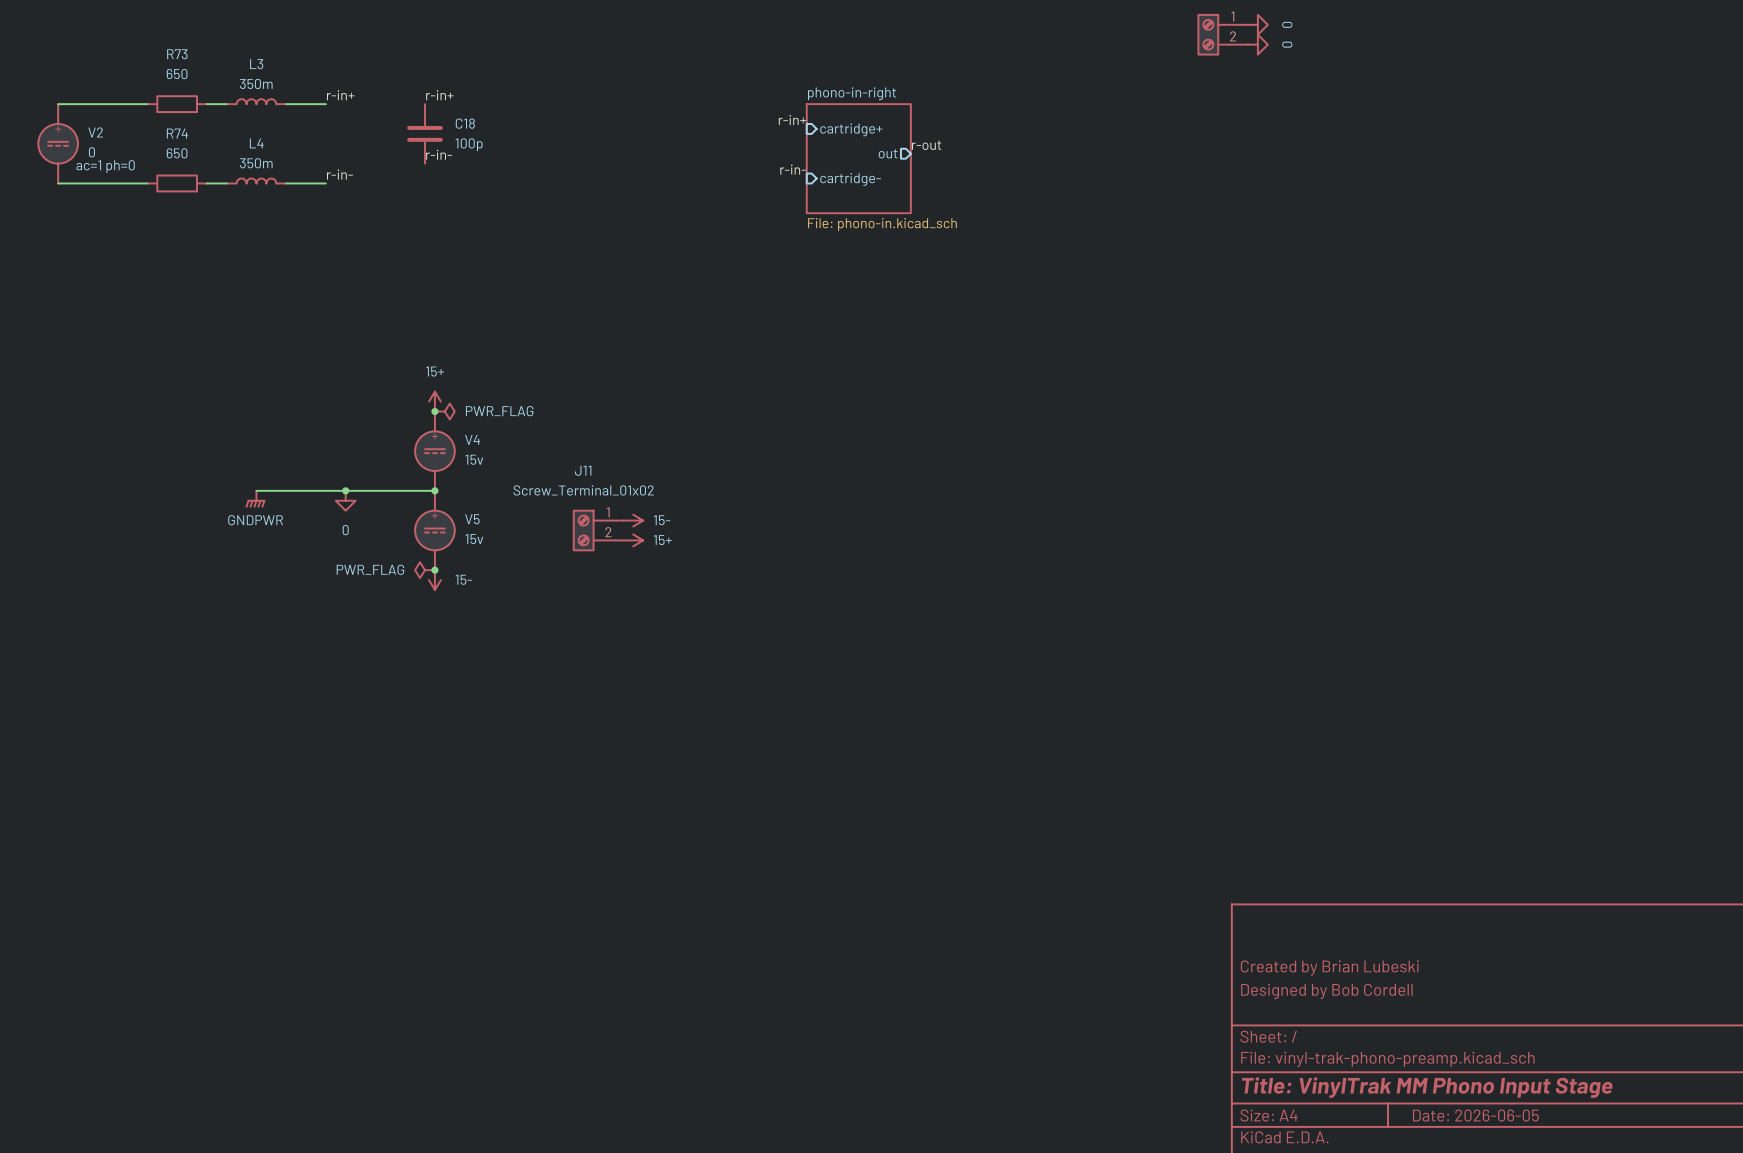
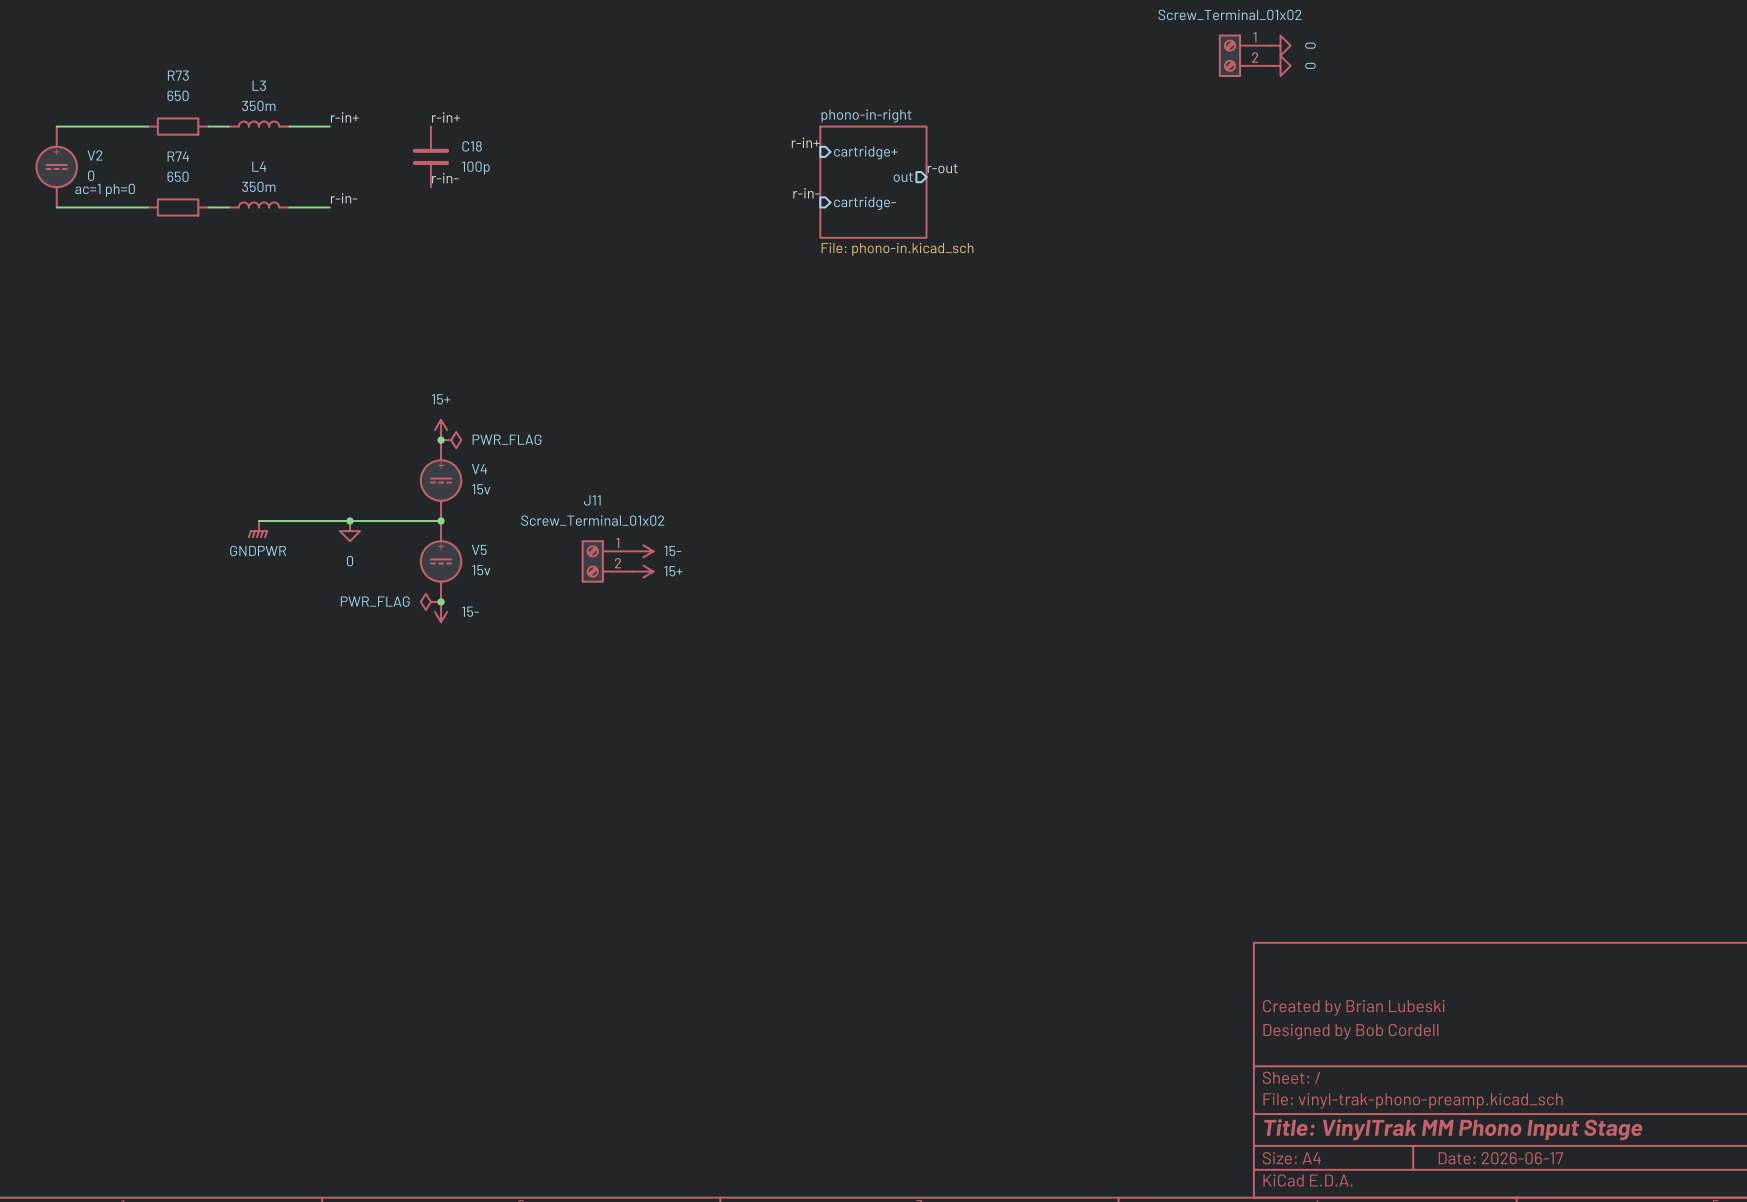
title block: Date: 2026-06-05 (1475, 1115) -> Date: 2026-06-17 (1500, 1158)

